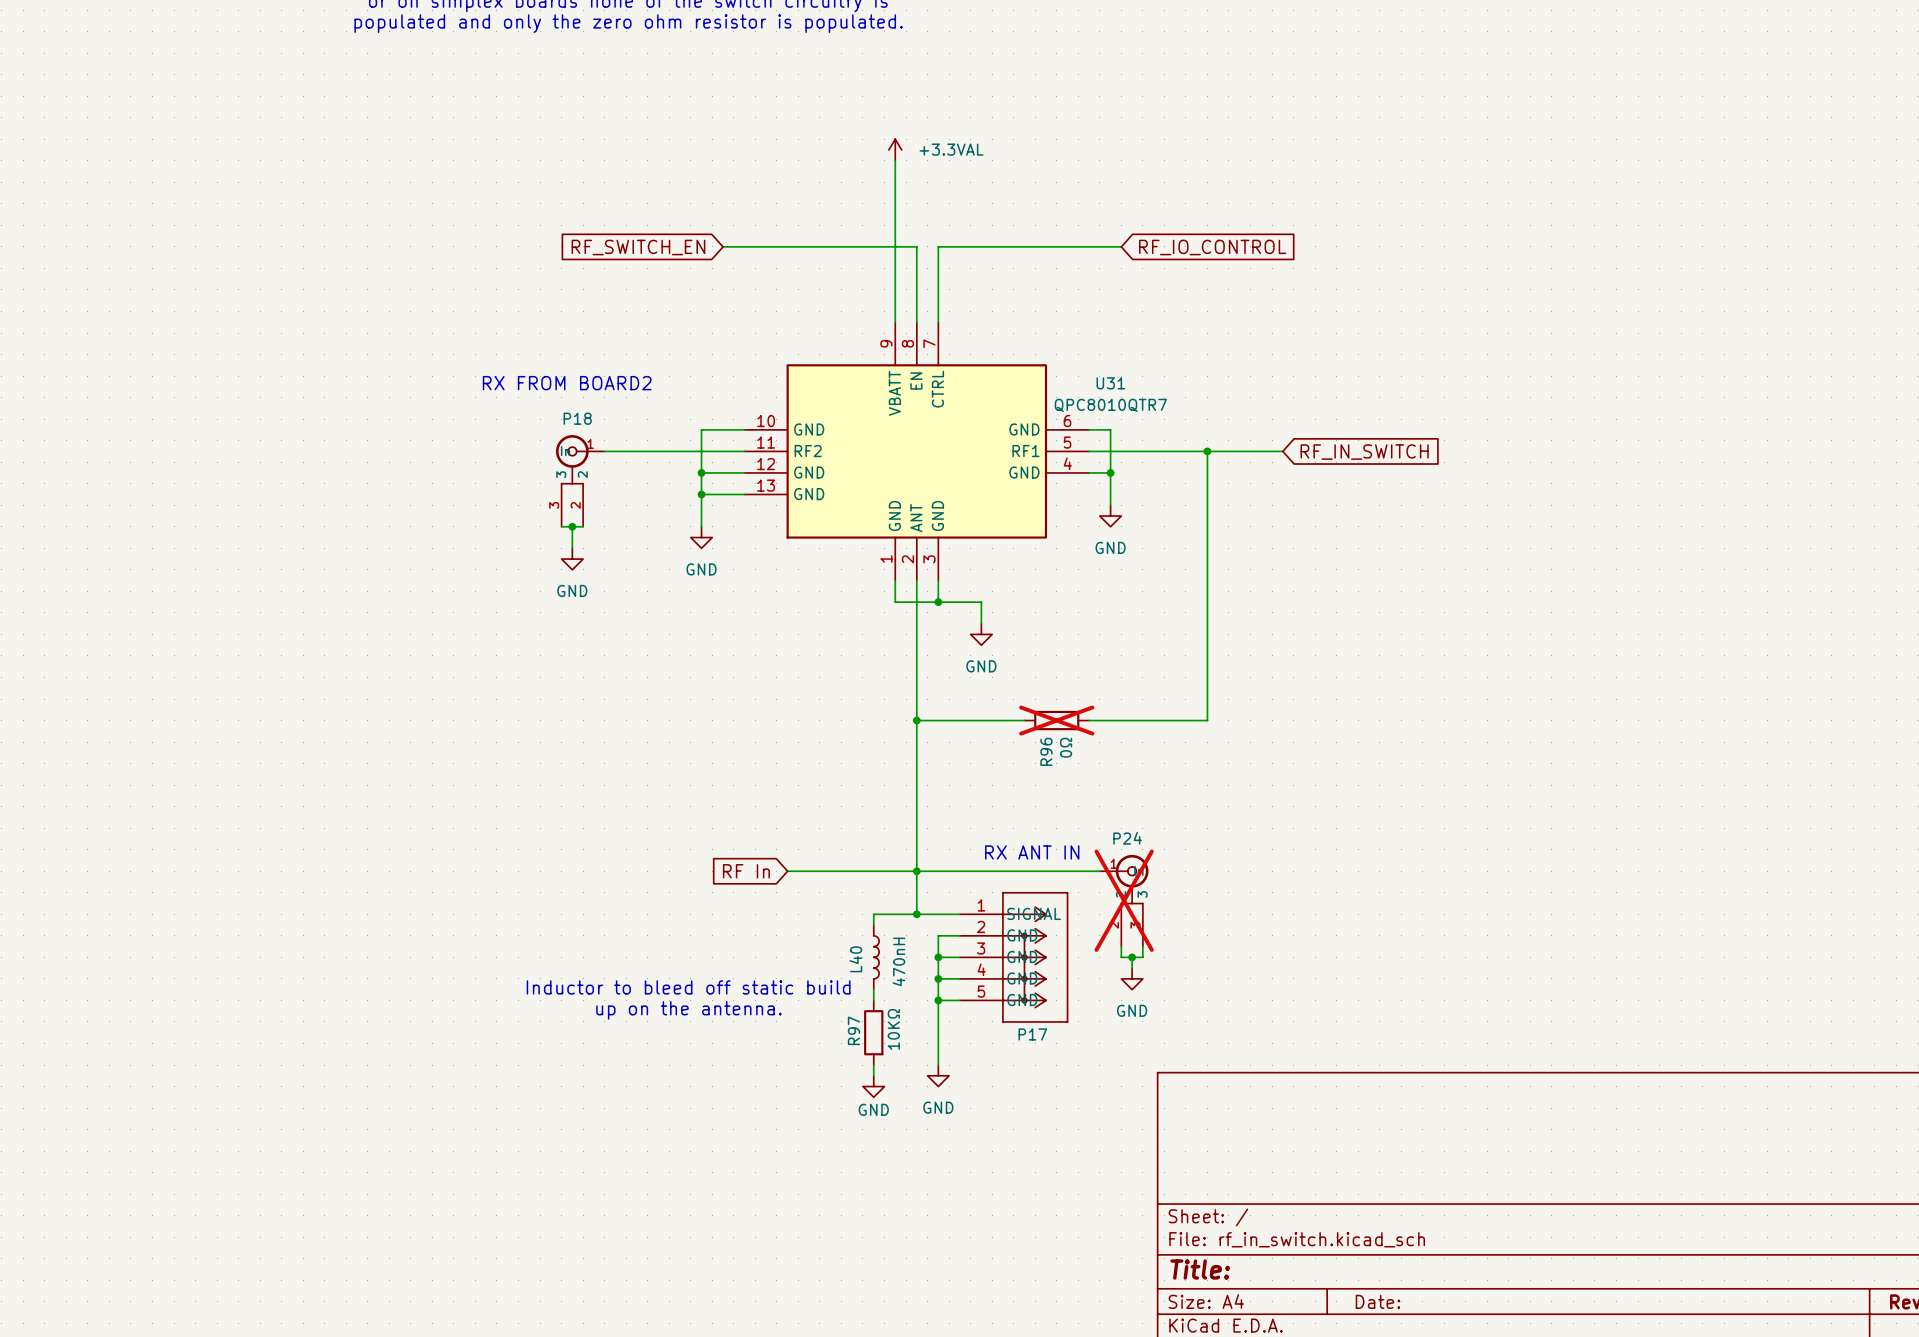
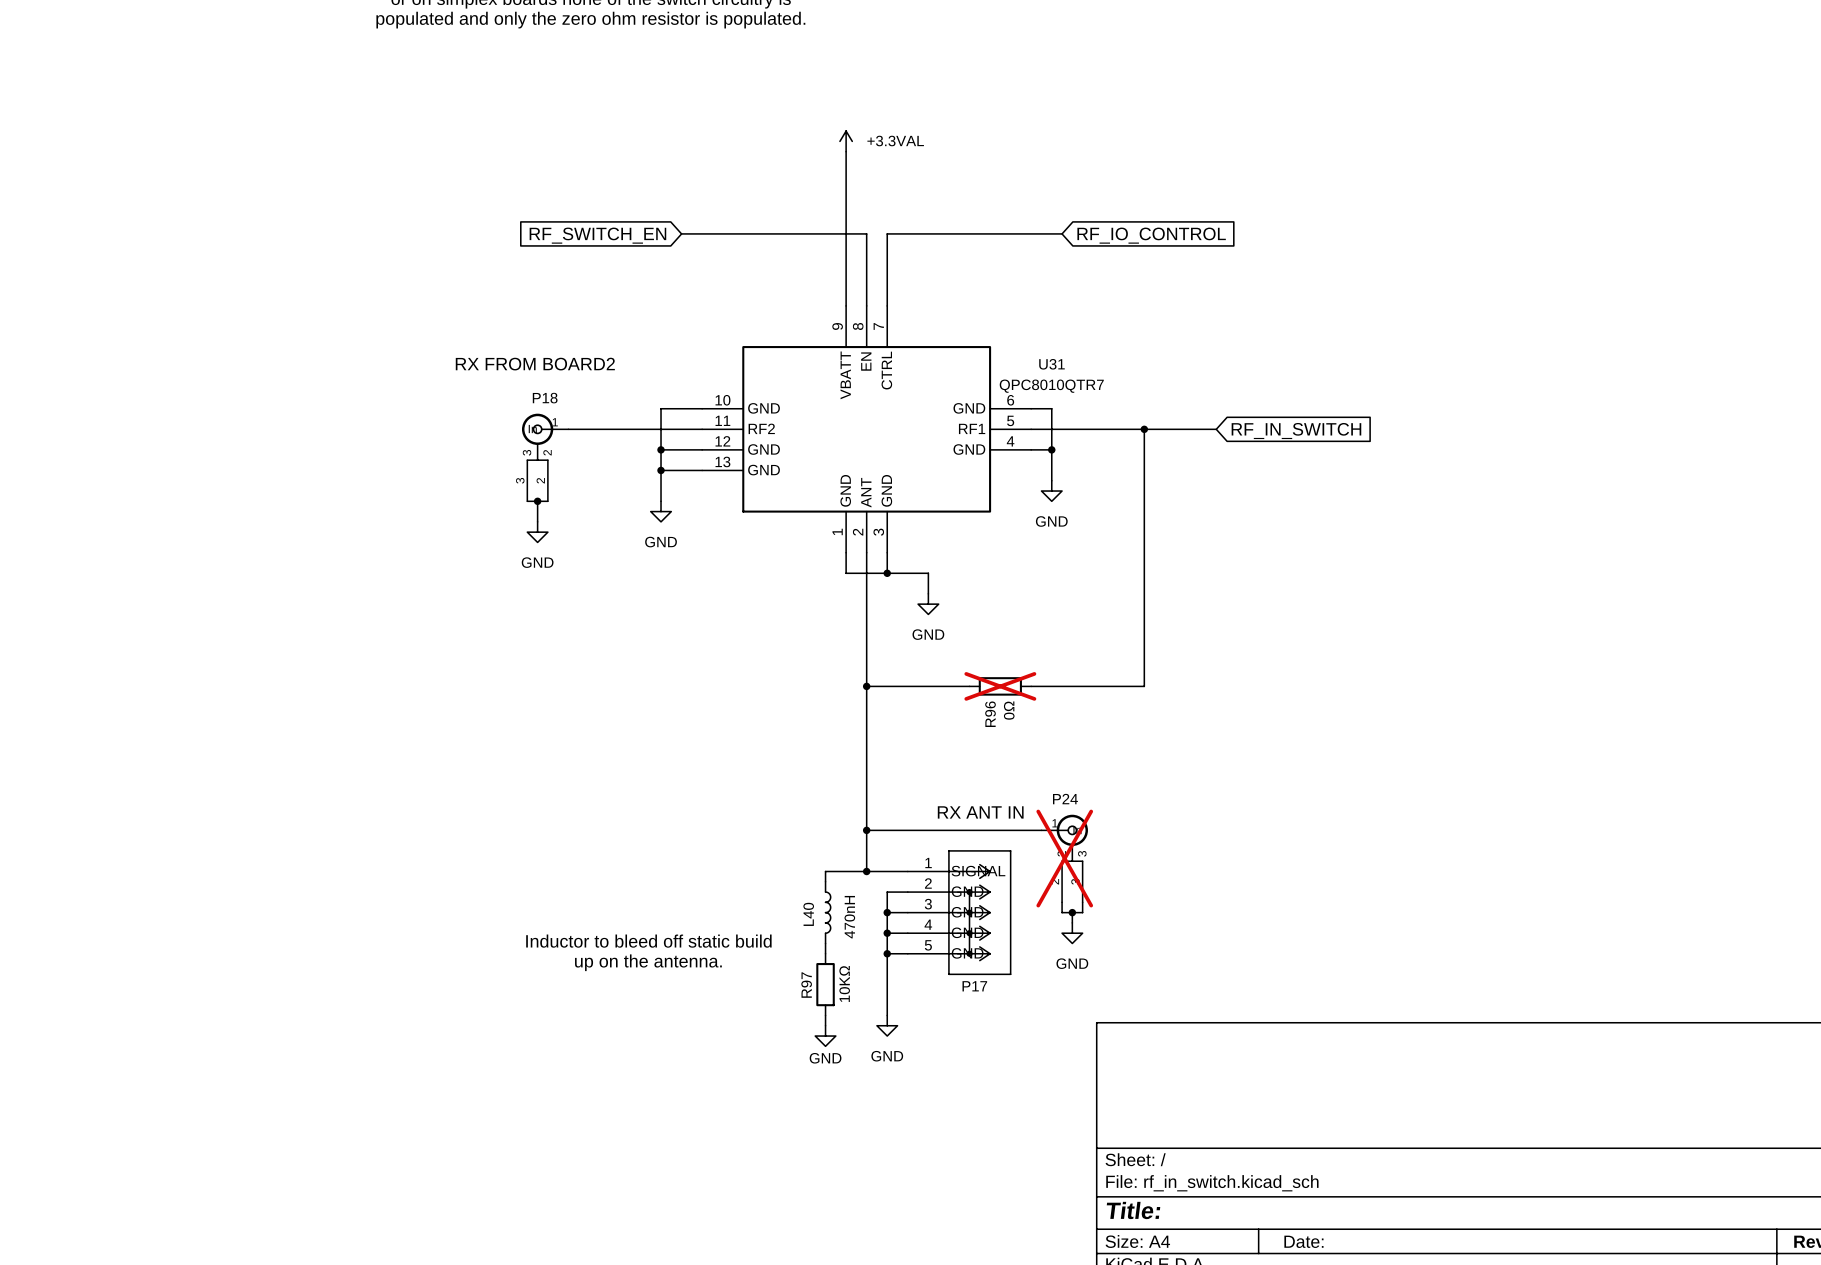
global label: RF In (746, 871) -> none
wire: (787, 871) (916, 871) -> none

